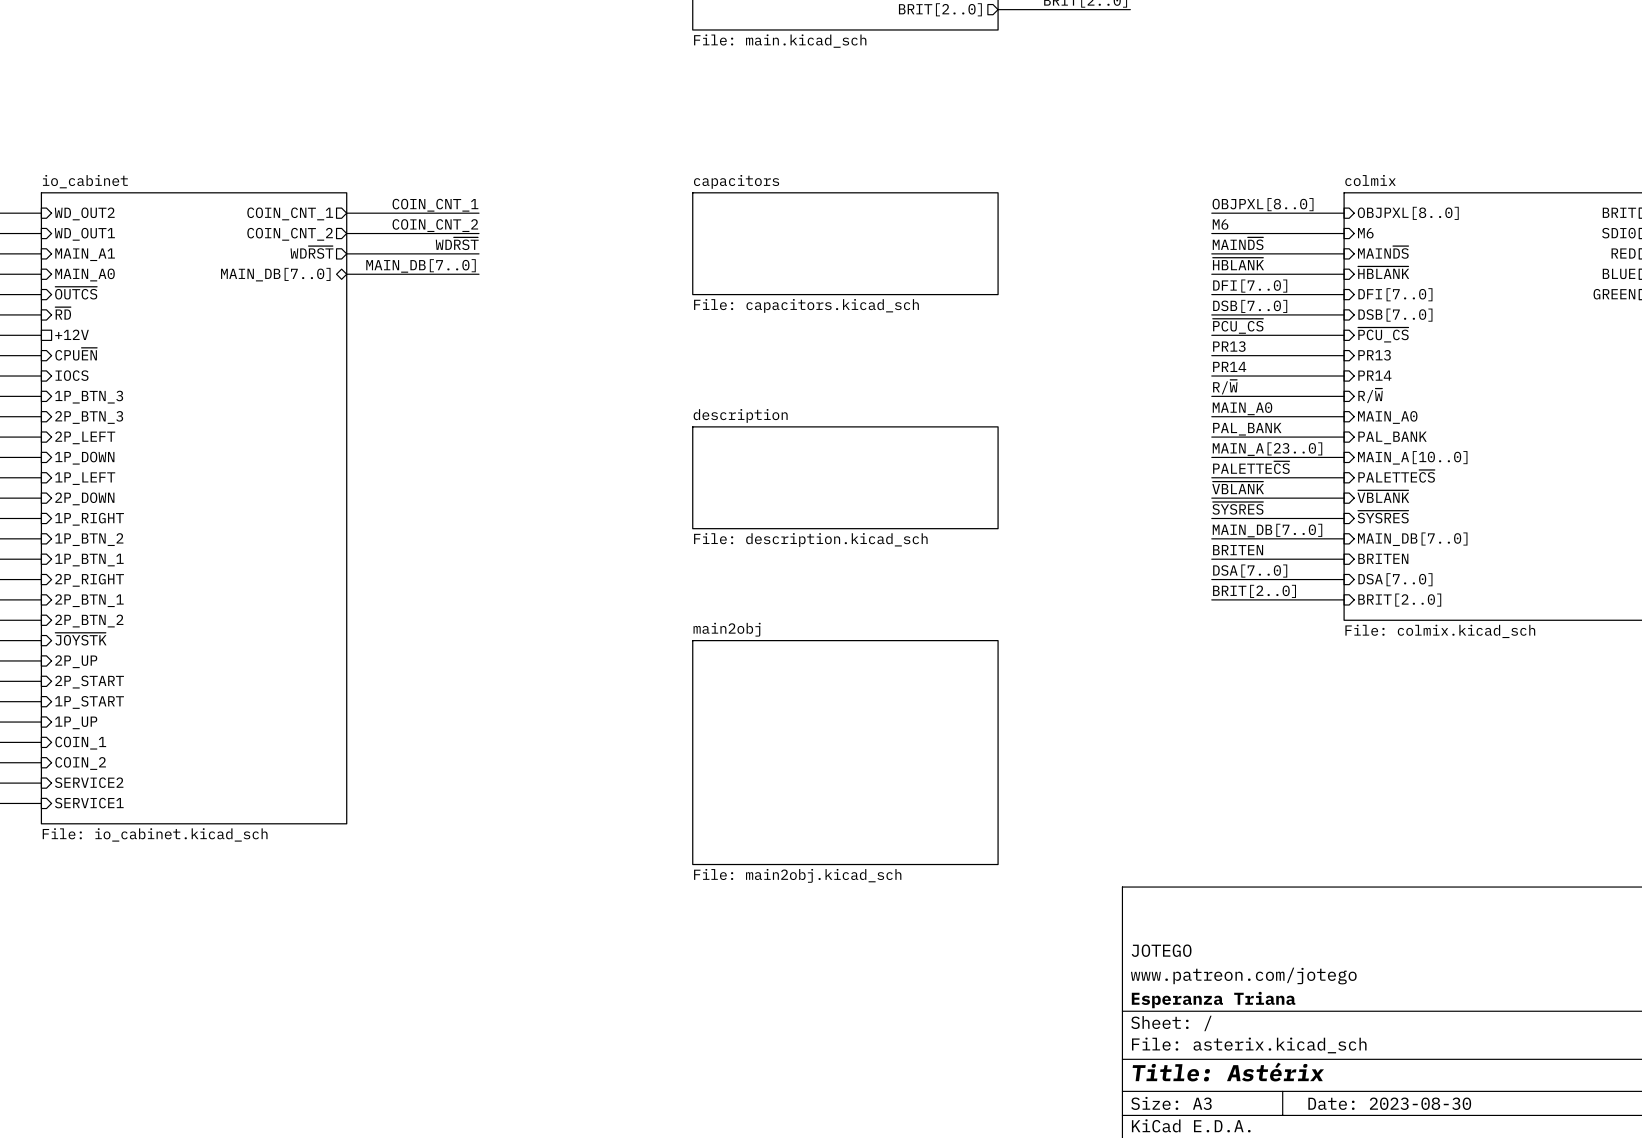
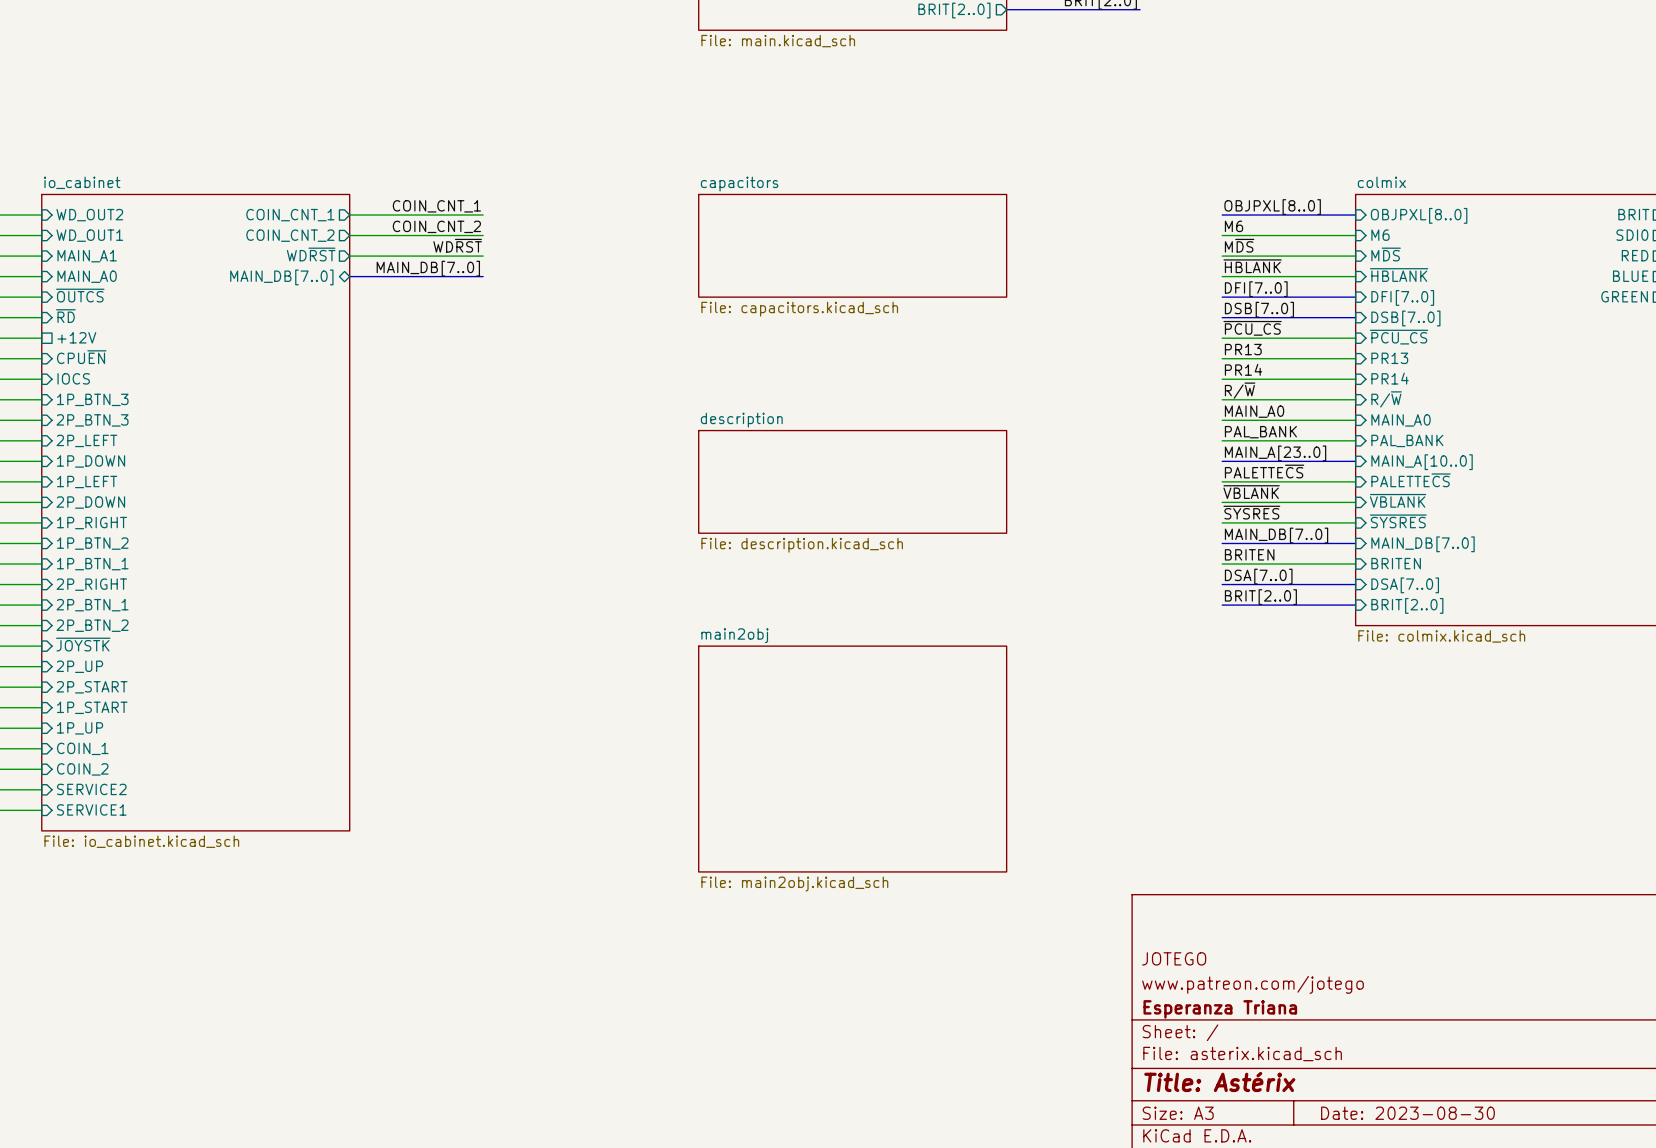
label: MAIN~{DS} (1238, 243) -> M~{DS} (1239, 245)
sheet pin: MAIN~{DS} (1383, 252) -> M~{DS} (1386, 254)

